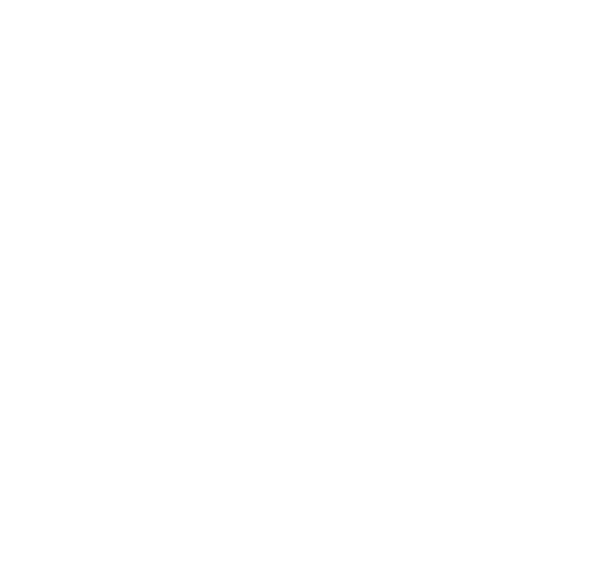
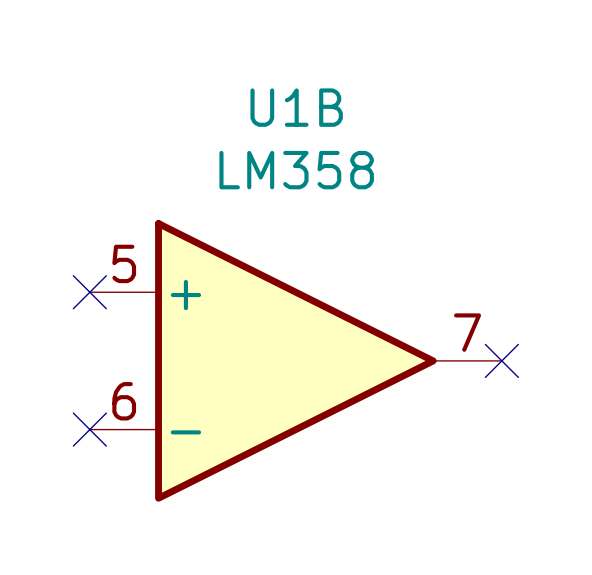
no-connect mark: none -> (89, 292)
U1B: none -> LM358 (295, 360)
no-connect mark: none -> (501, 360)
no-connect mark: none -> (89, 429)

